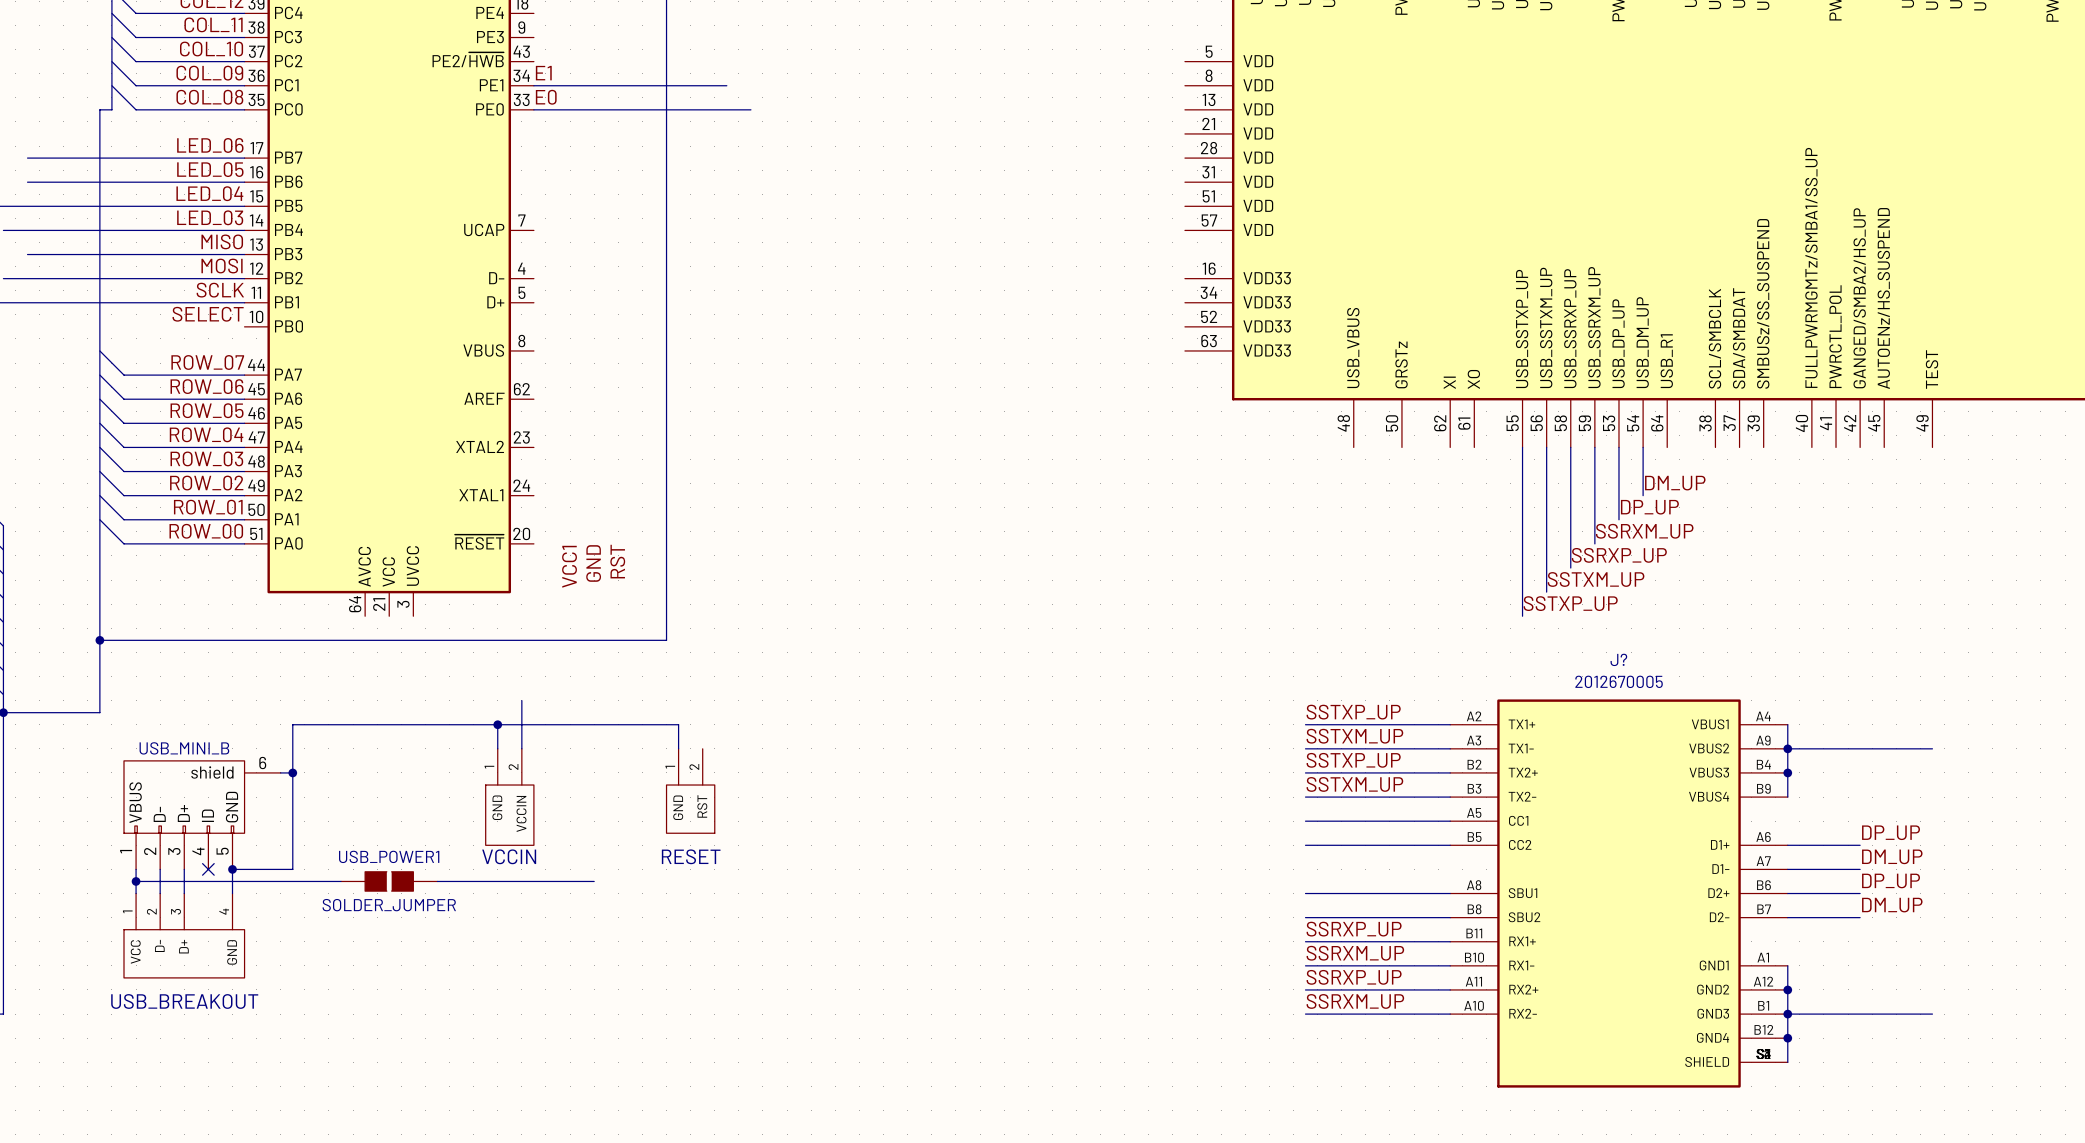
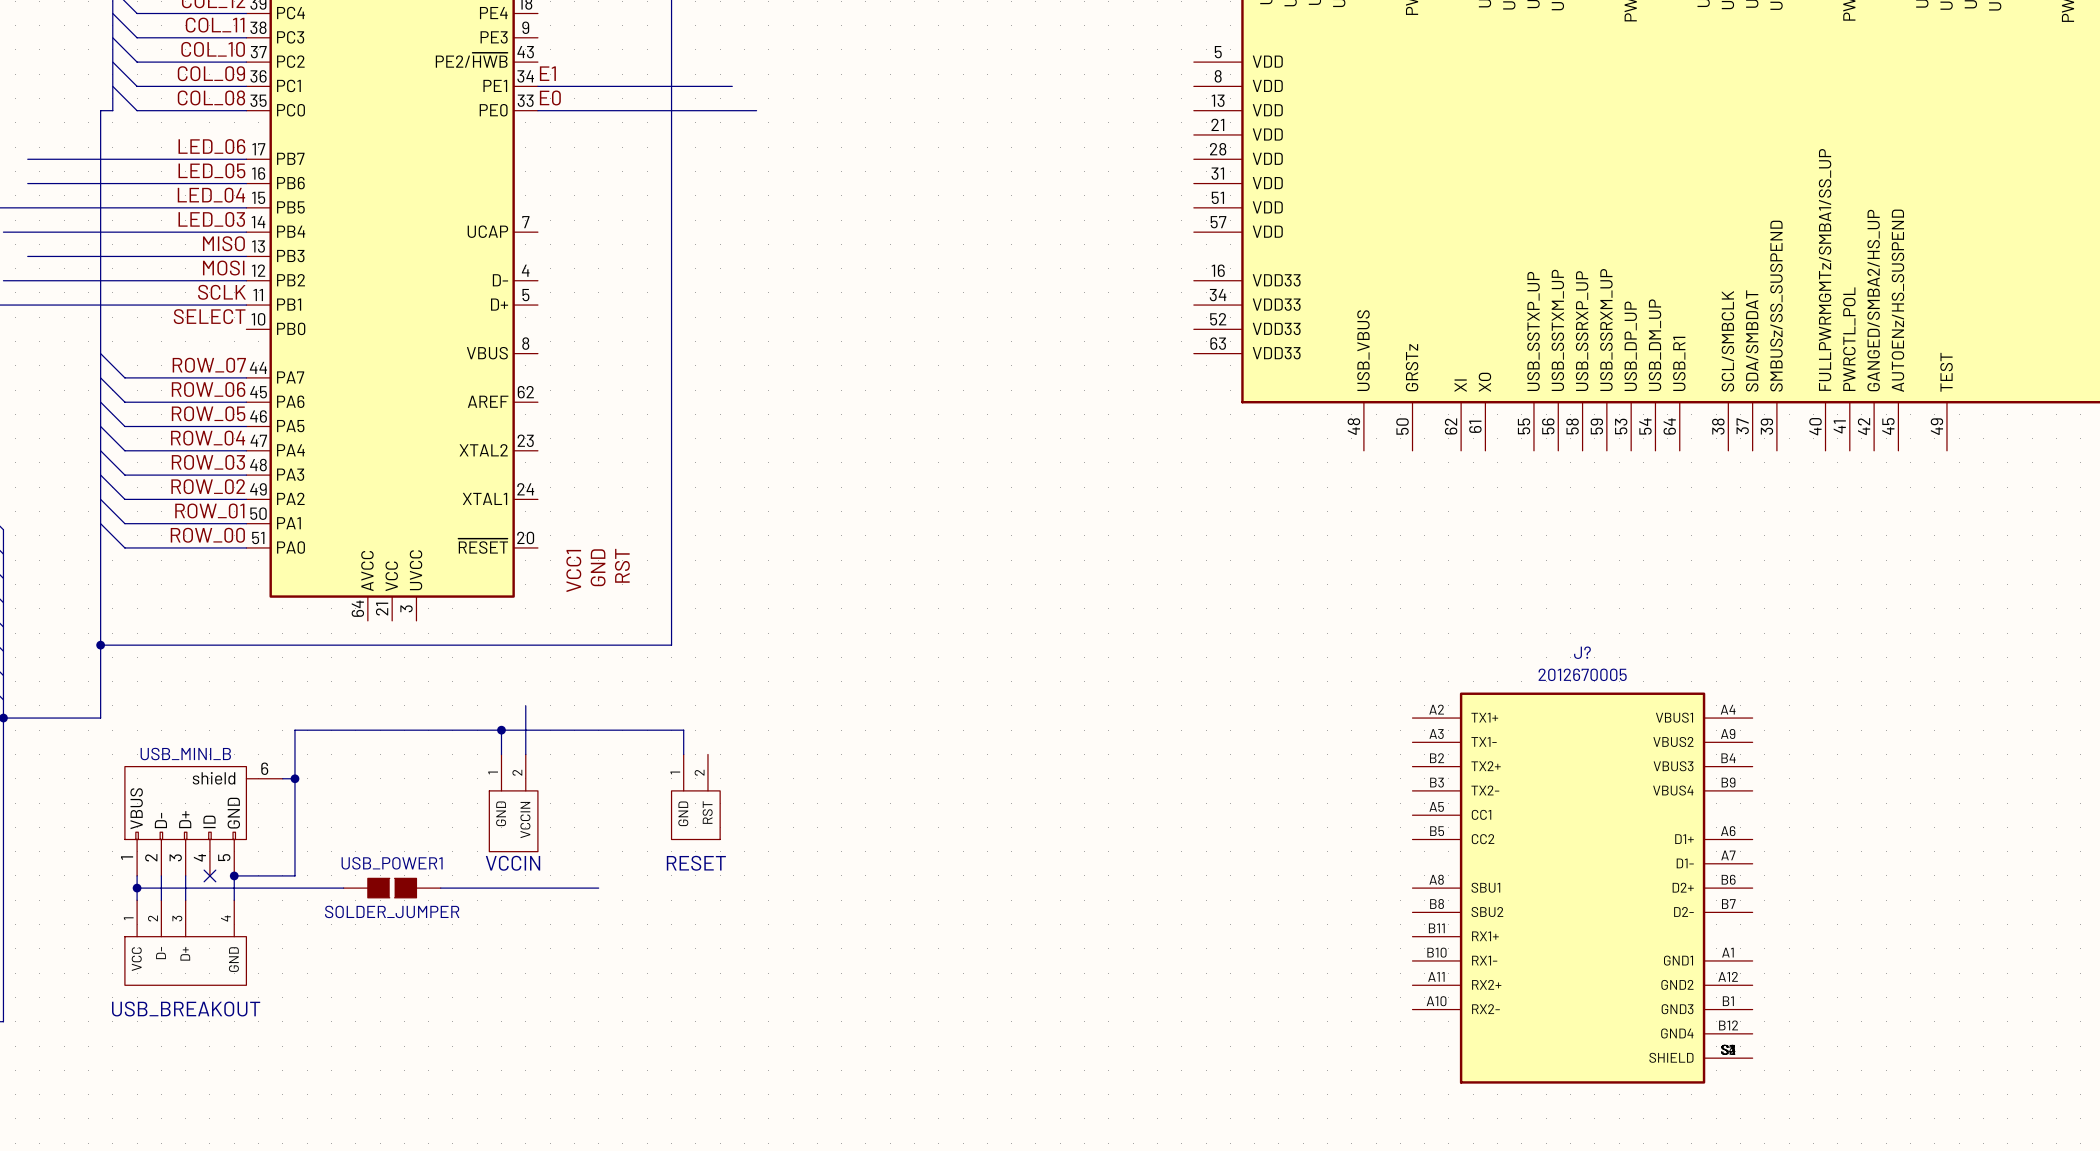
wire: (1522, 447) (1522, 616) -> none
wire: (1546, 447) (1546, 592) -> none
wire: (1570, 447) (1570, 567) -> none
wire: (1594, 447) (1594, 543) -> none
wire: (1618, 447) (1618, 519) -> none
wire: (1643, 447) (1643, 495) -> none
label: DM_UP (1675, 483) -> none
label: DP_UP (1649, 507) -> none
label: SSRXM_UP (1644, 531) -> none
label: SSRXP_UP (1619, 555) -> none
label: SSTXM_UP (1596, 579) -> none
label: SSTXP_UP (1570, 603) -> none
label: SSTXP_UP (1353, 712) -> none
wire: (1305, 724) (1450, 724) -> none
wire: (1787, 724) (1787, 797) -> none
label: SSTXM_UP (1354, 736) -> none
wire: (1305, 748) (1450, 748) -> none
wire: (1787, 748) (1932, 748) -> none
junction: (1787, 748) -> none
label: SSTXP_UP (1353, 760) -> none
wire: (1305, 772) (1450, 772) -> none
junction: (1787, 772) -> none
label: SSTXM_UP (1354, 784) -> none
wire: (1305, 797) (1450, 797) -> none
wire: (1305, 821) (1450, 821) -> none
label: DP_UP (1891, 832) -> none
wire: (1305, 845) (1450, 845) -> none
wire: (1787, 845) (1860, 845) -> none
label: DM_UP (1892, 856) -> none
wire: (1787, 869) (1860, 869) -> none
label: DP_UP (1891, 880) -> none
wire: (1305, 893) (1450, 893) -> none
J? position: (1618, 893) -> (1582, 888)
wire: (1787, 893) (1860, 893) -> none
label: DM_UP (1892, 905) -> none
wire: (1305, 917) (1450, 917) -> none
wire: (1787, 917) (1860, 917) -> none
label: SSRXP_UP (1354, 929) -> none
wire: (1305, 941) (1450, 941) -> none
label: SSRXM_UP (1355, 953) -> none
wire: (1305, 965) (1450, 965) -> none
wire: (1787, 965) (1787, 1062) -> none
label: SSRXP_UP (1354, 977) -> none
wire: (1305, 989) (1450, 989) -> none
junction: (1787, 989) -> none
label: SSRXM_UP (1355, 1001) -> none
wire: (1305, 1014) (1450, 1014) -> none
wire: (1787, 1014) (1932, 1014) -> none
junction: (1787, 1014) -> none
junction: (1787, 1038) -> none

